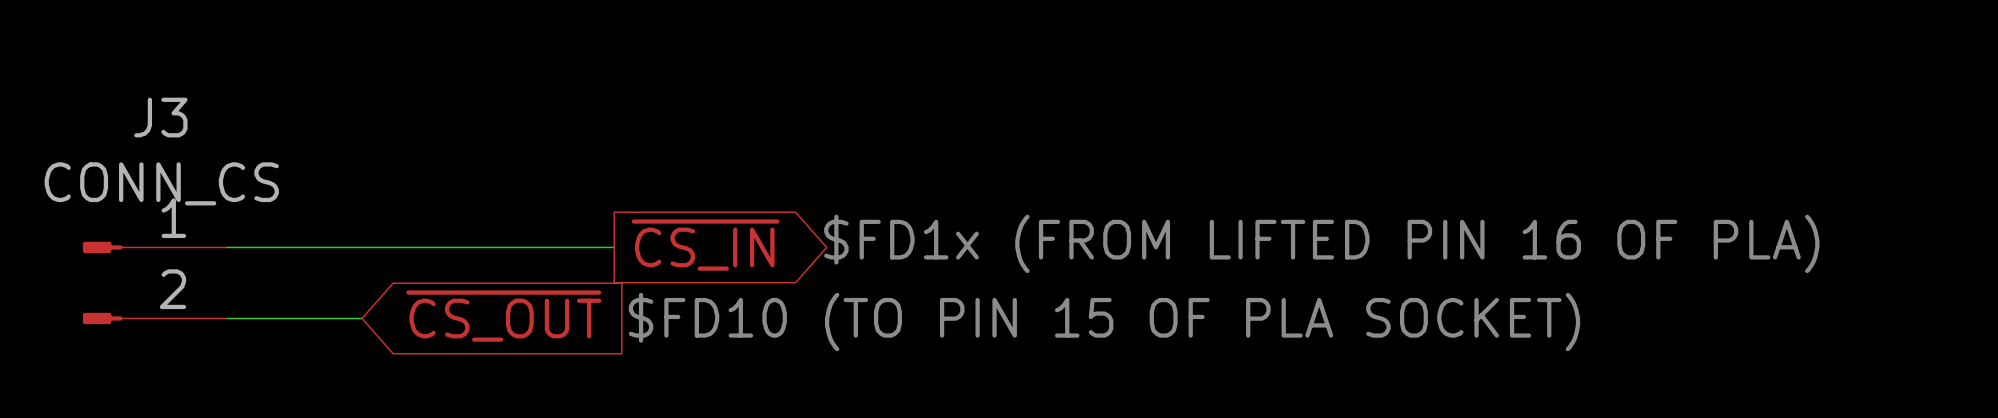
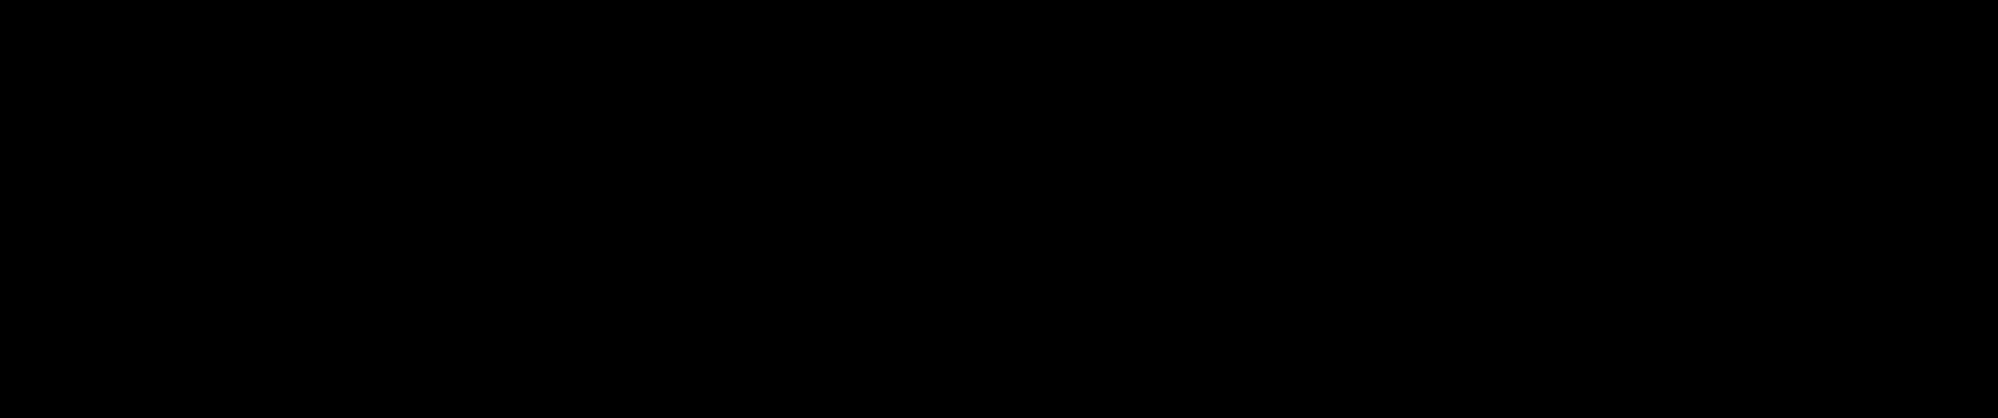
text: $FD1x (FROM LIFTED PIN 16 OF PLA) (1321, 243) -> none
global label: ~{CS_IN} (705, 245) -> none
wire: (227, 247) (614, 247) -> none
J3: CONN_CS (154, 282) -> none
global label: ~{CS_OUT} (503, 316) -> none
wire: (227, 318) (362, 318) -> none
text: $FD10 (TO PIN 15 OF PLA SOCKET) (1104, 322) -> none

